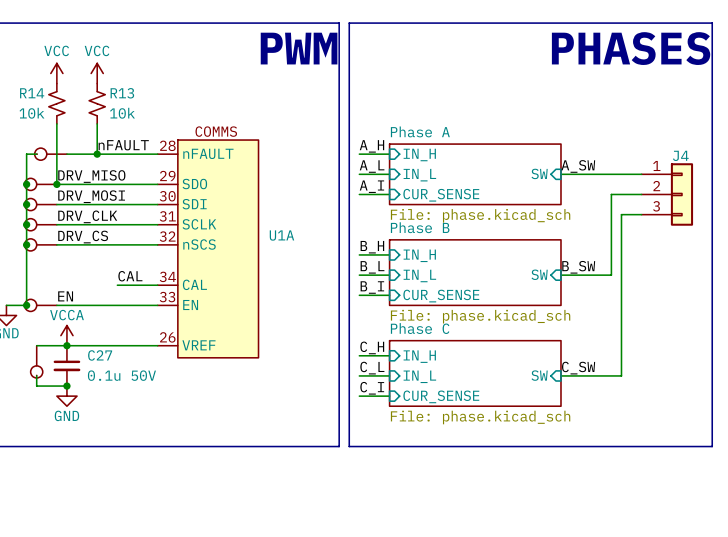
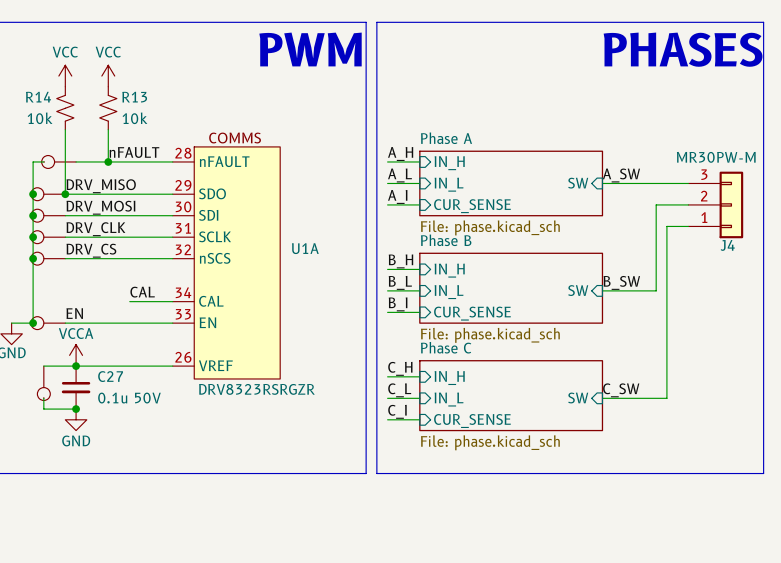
J4 text: none -> MR30PW-M (716, 157)
J4 flip: as is (681, 194) -> up-down (731, 204)
U1A text: none -> DRV8323RSRGZR (256, 389)

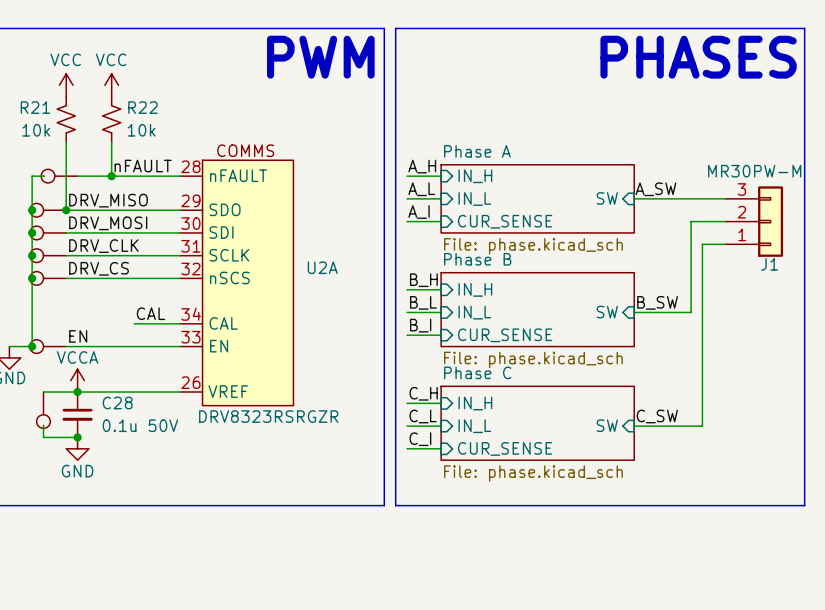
R14 name: R14 (38, 97) -> R21 (35, 107)
R13 name: R13 (134, 97) -> R22 (142, 107)
J4 name: J4 (727, 245) -> J1 (769, 264)
U1A name: U1A (305, 248) -> U2A (322, 267)
C27 name: C27 (110, 376) -> C28 (117, 403)

